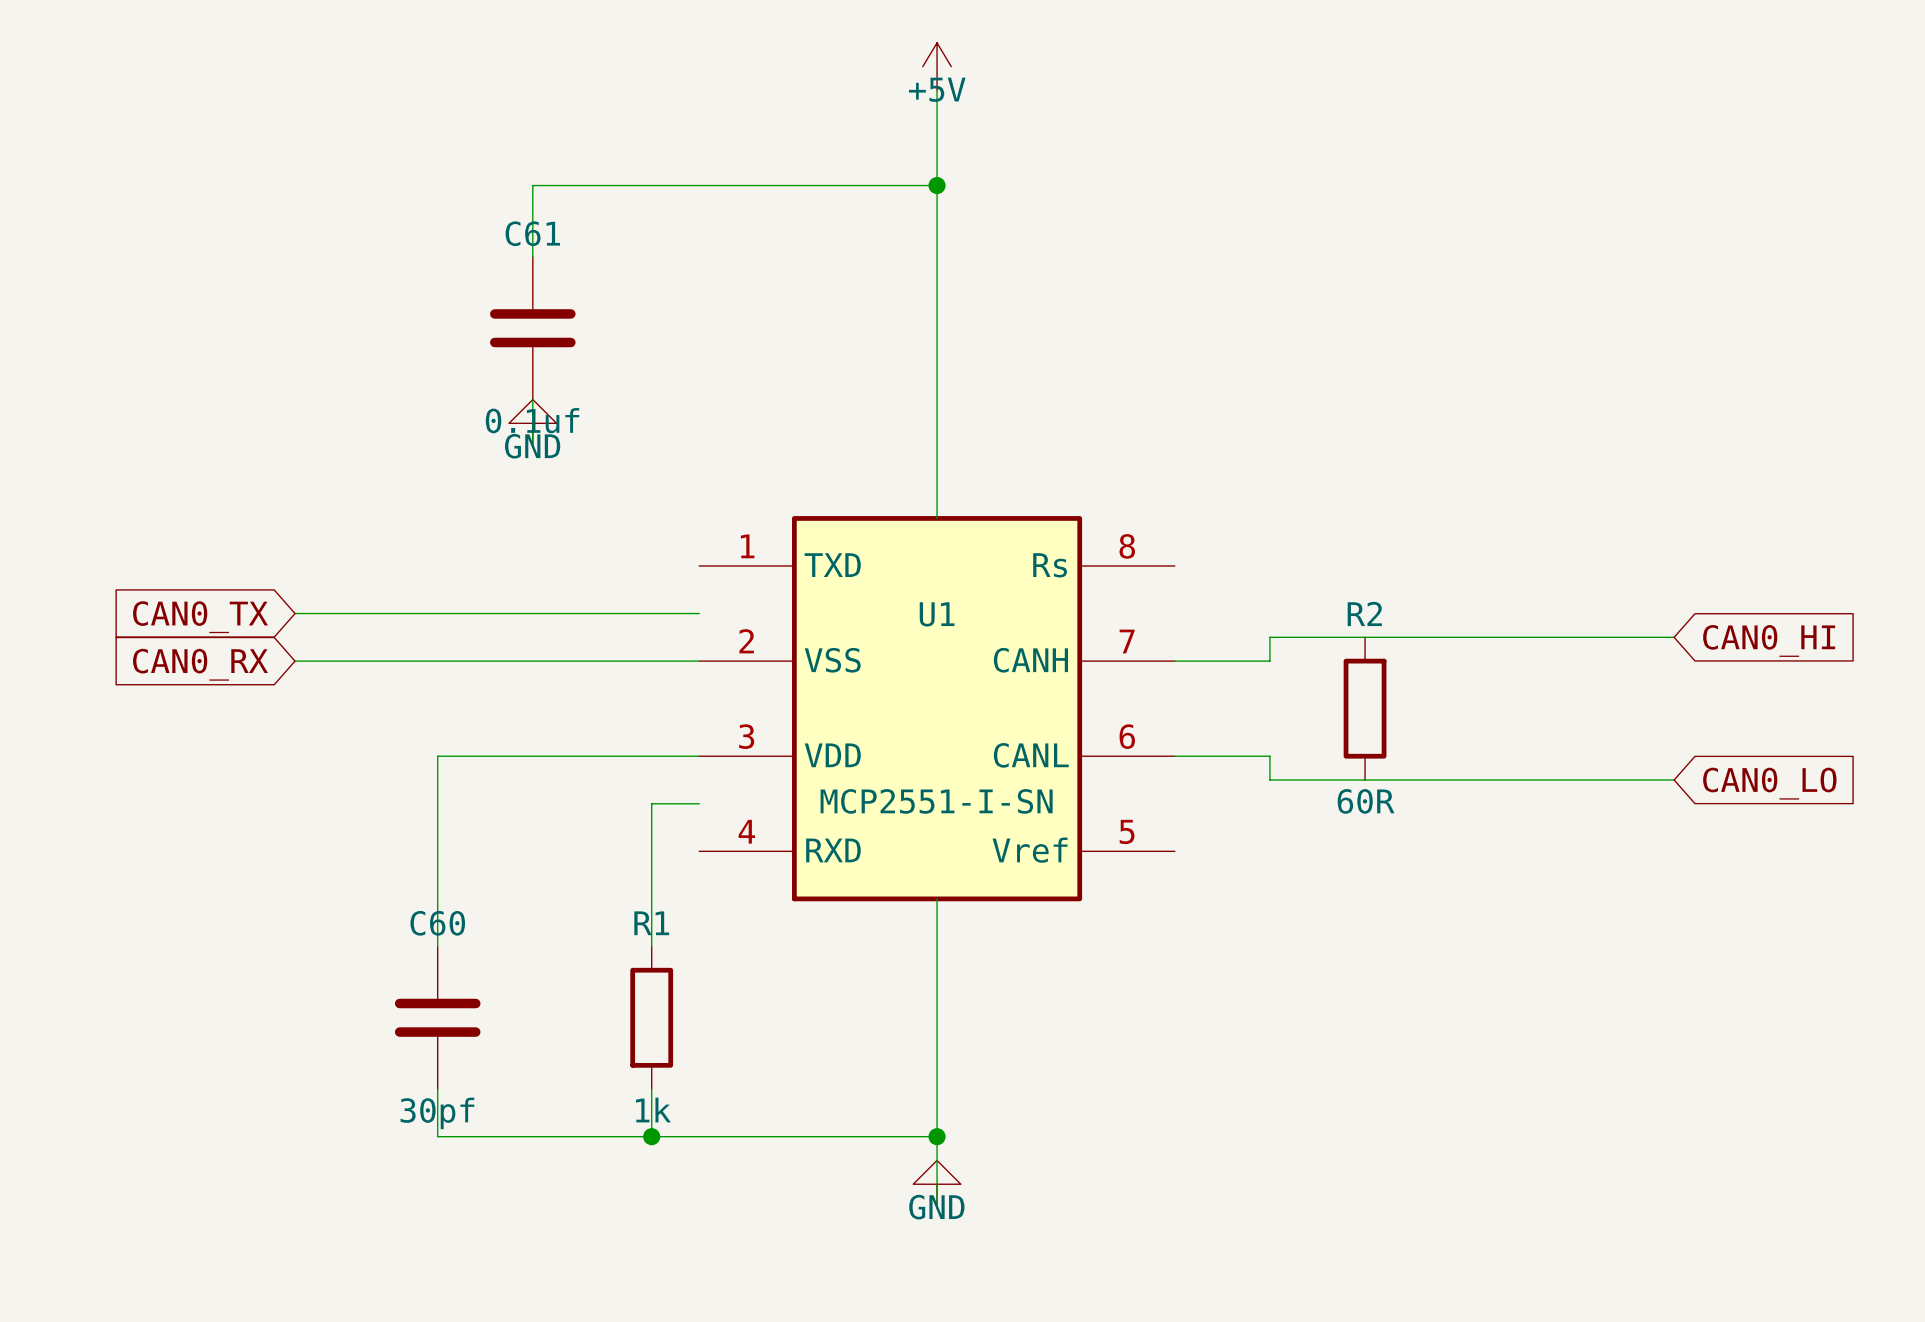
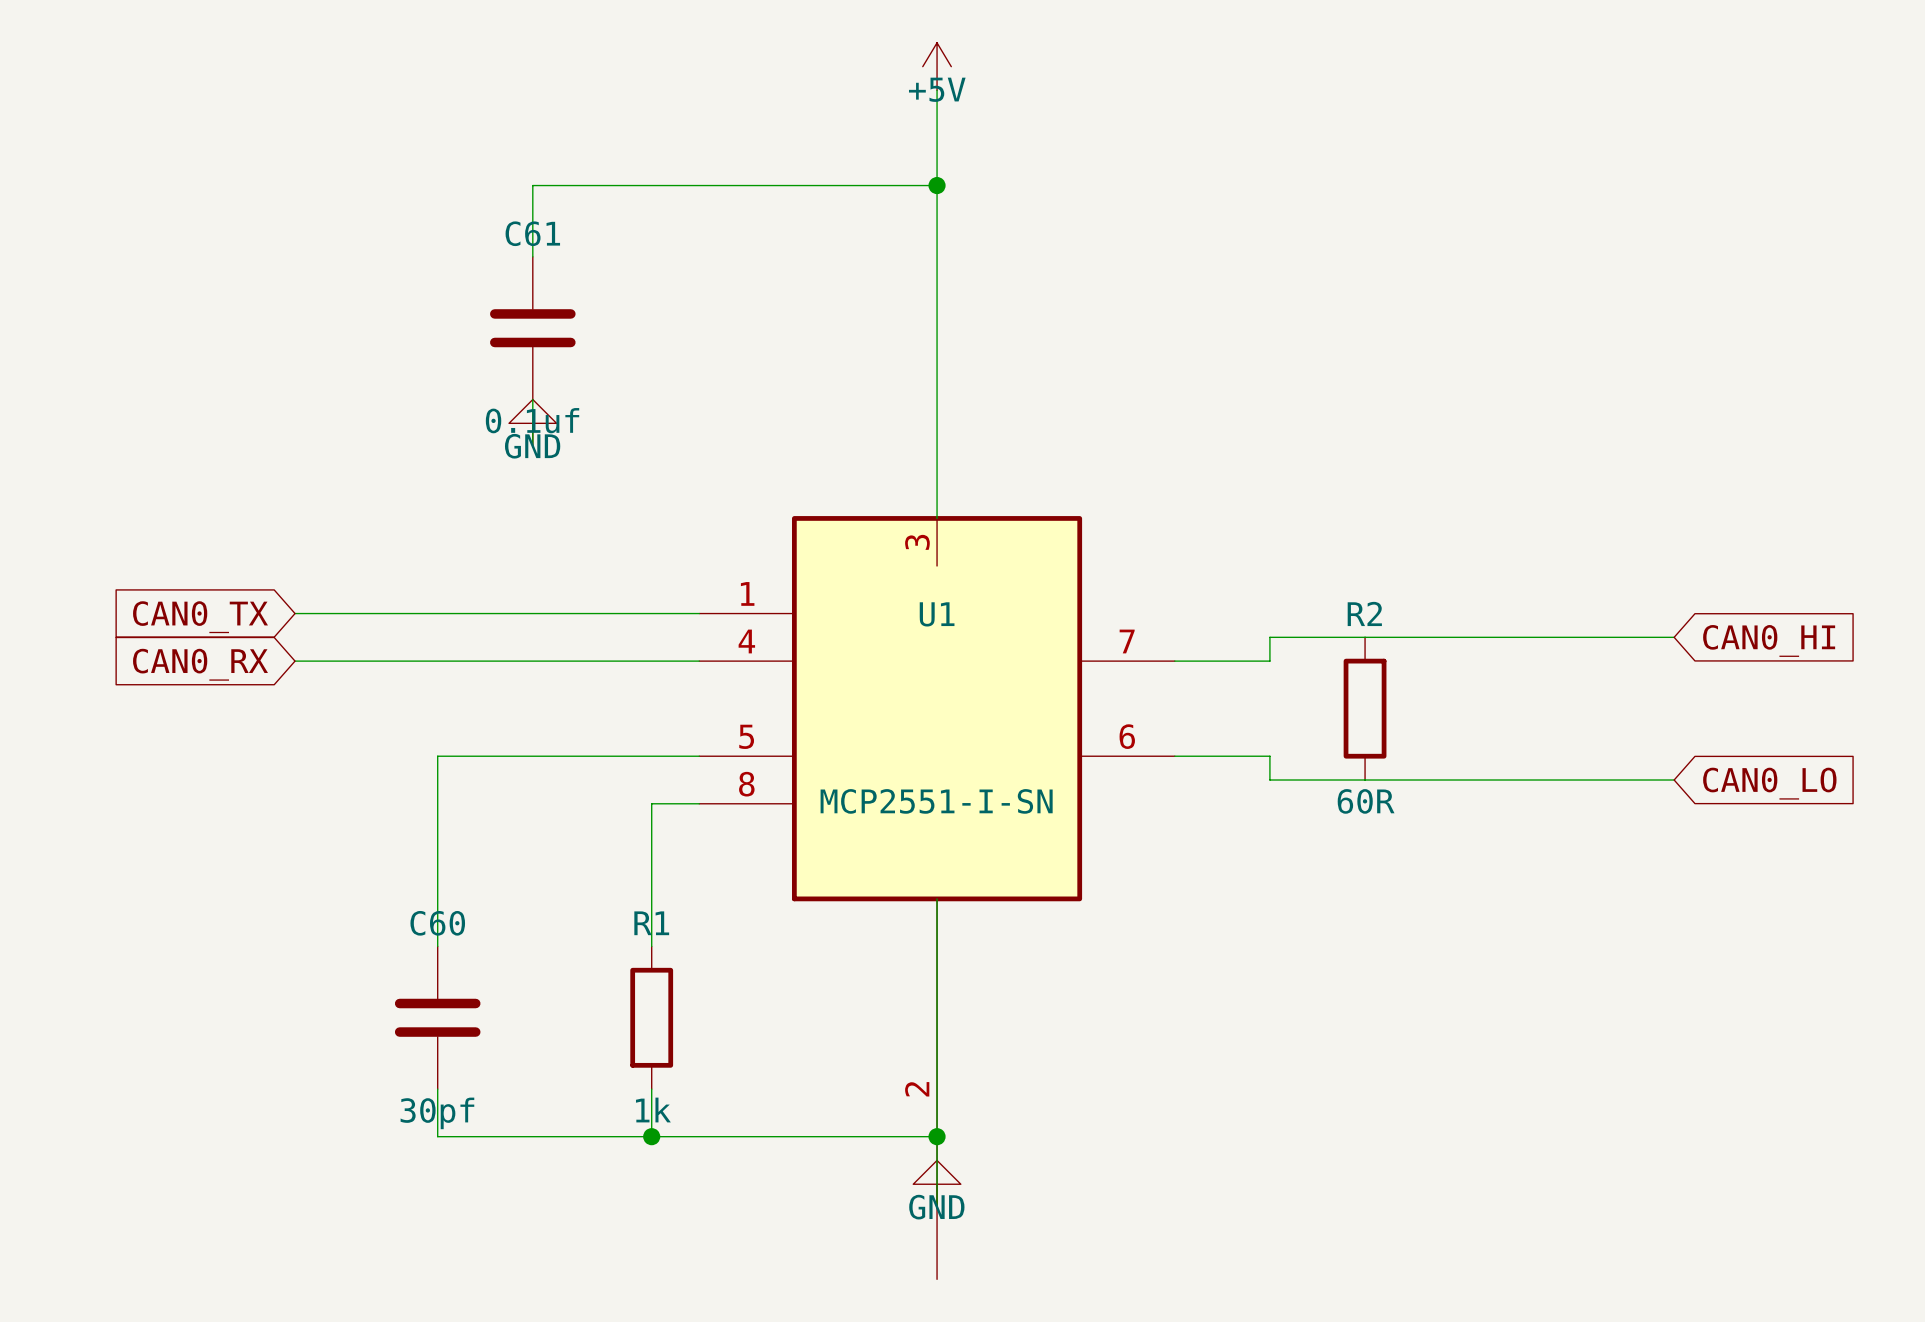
U1 symbol: [699, 516, 1175, 902] -> [699, 516, 1175, 1280]

